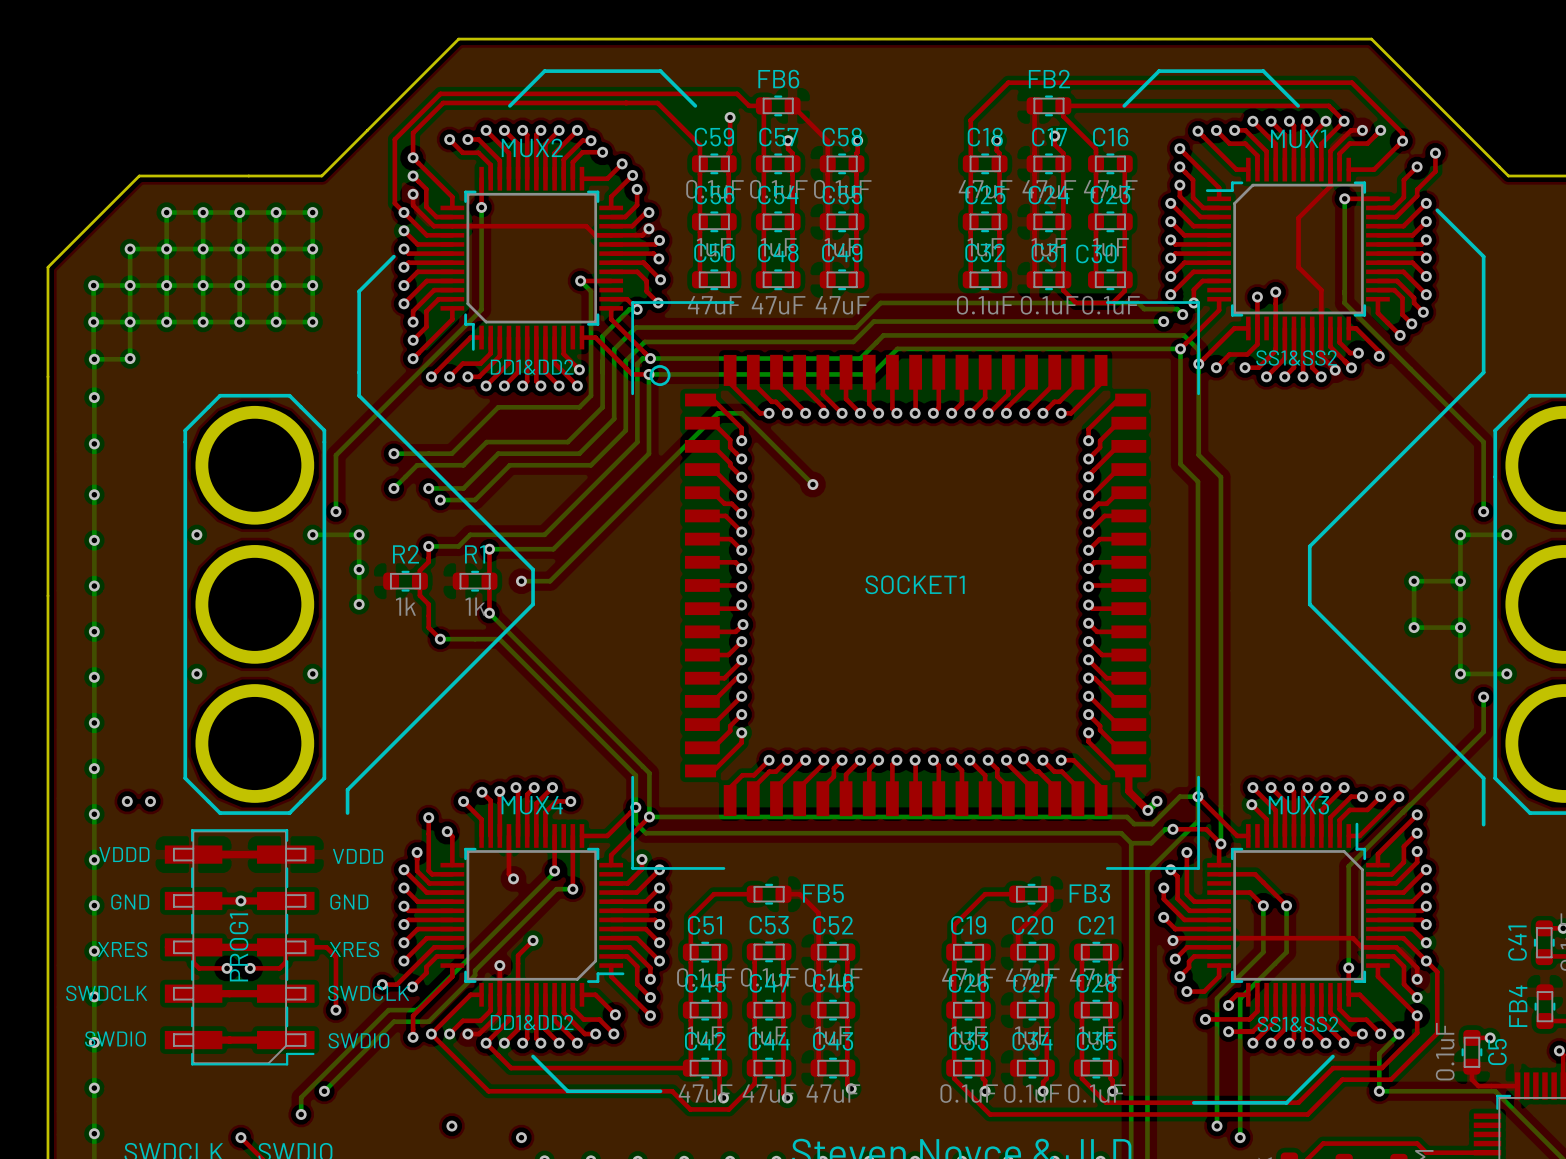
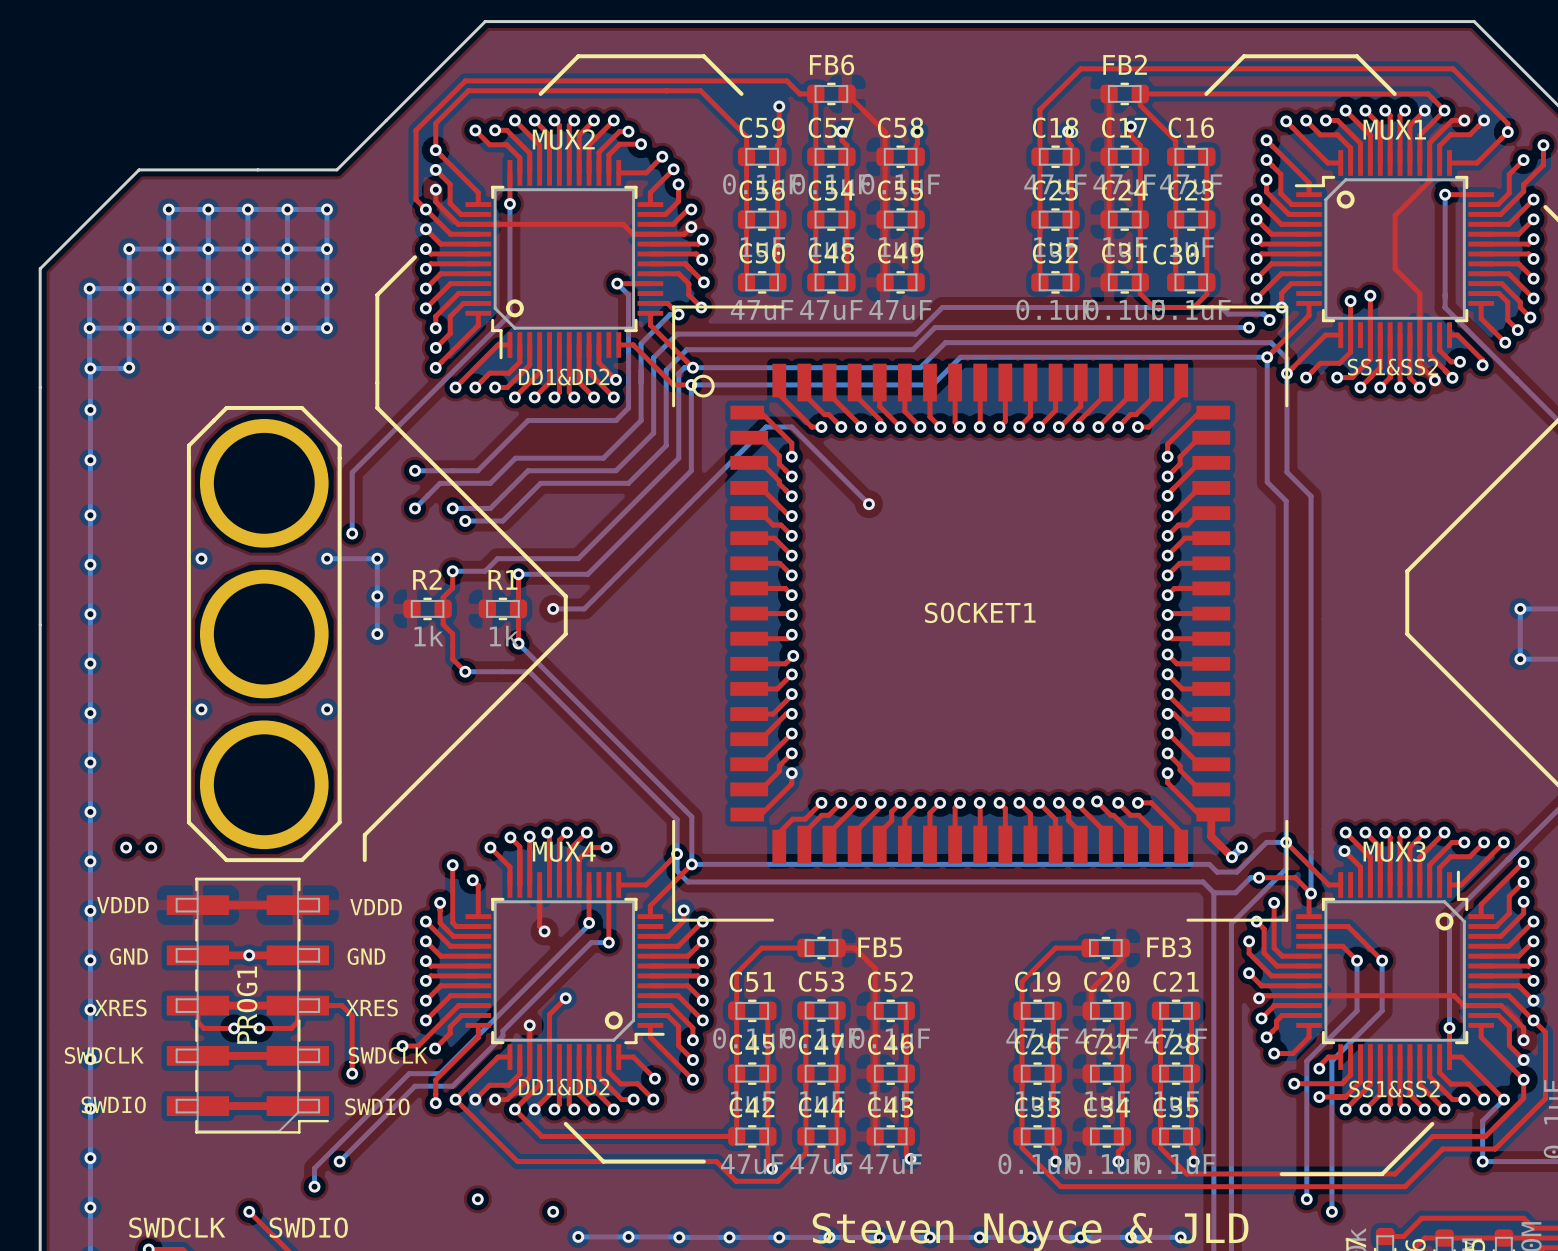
drawing: none -> [1336, 190, 1355, 209]
drawing: none -> [505, 299, 524, 318]
drawing: none -> [1435, 912, 1454, 931]
drawing: none -> [604, 1011, 623, 1030]

